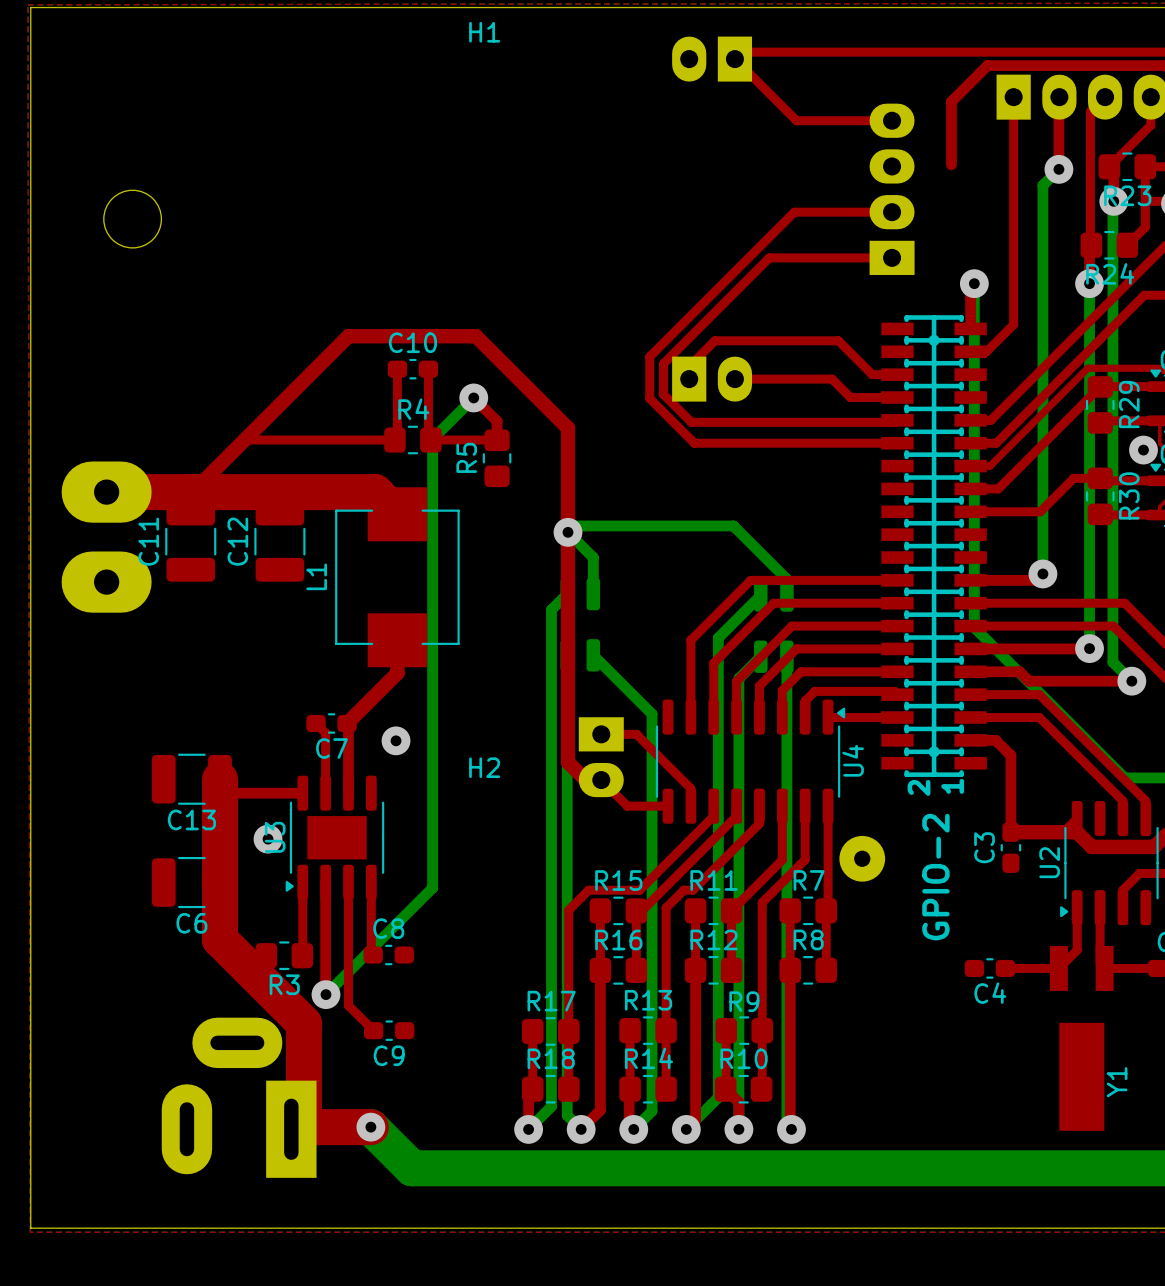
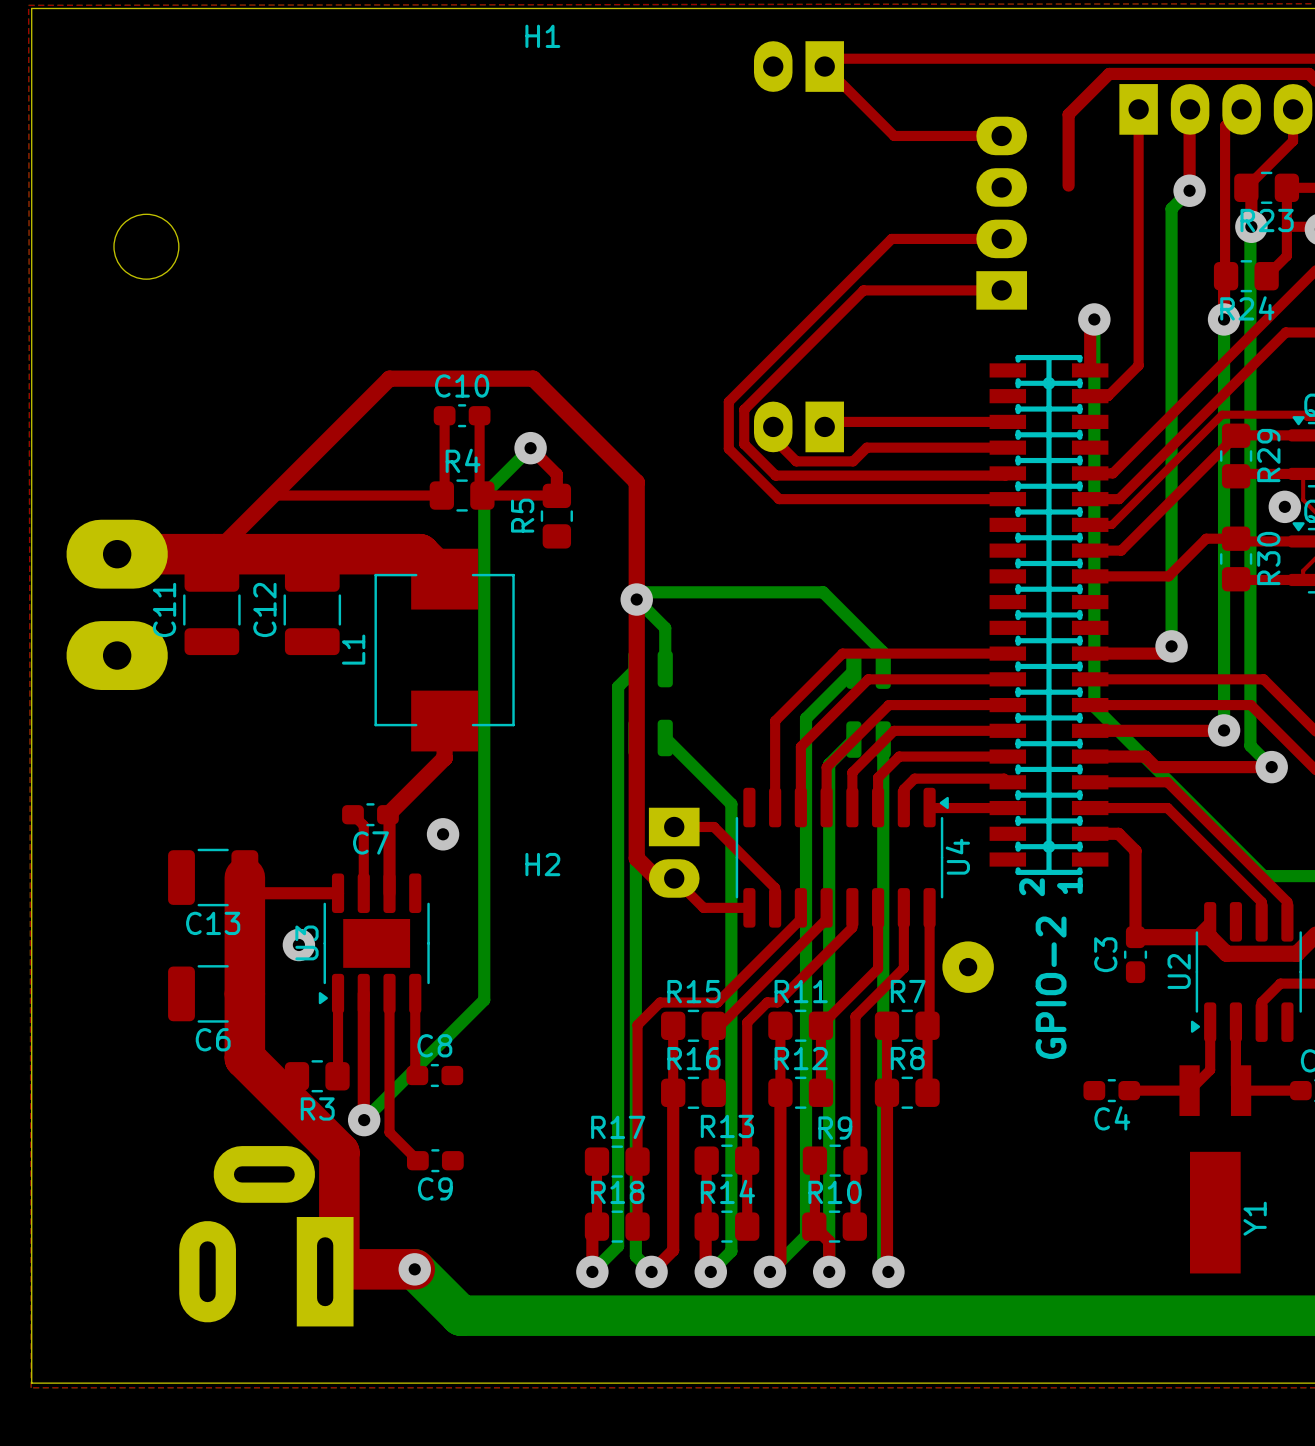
top track: (872, 374) (838, 340) (714, 340) (689, 366) (689, 379) -> (979, 421) (829, 421)
part rotation: 0° (712, 379) -> 180° (798, 426)
top track: (734, 379) (832, 379) (850, 397) -> (773, 438) (796, 461) (853, 461) (866, 447) (954, 447)

